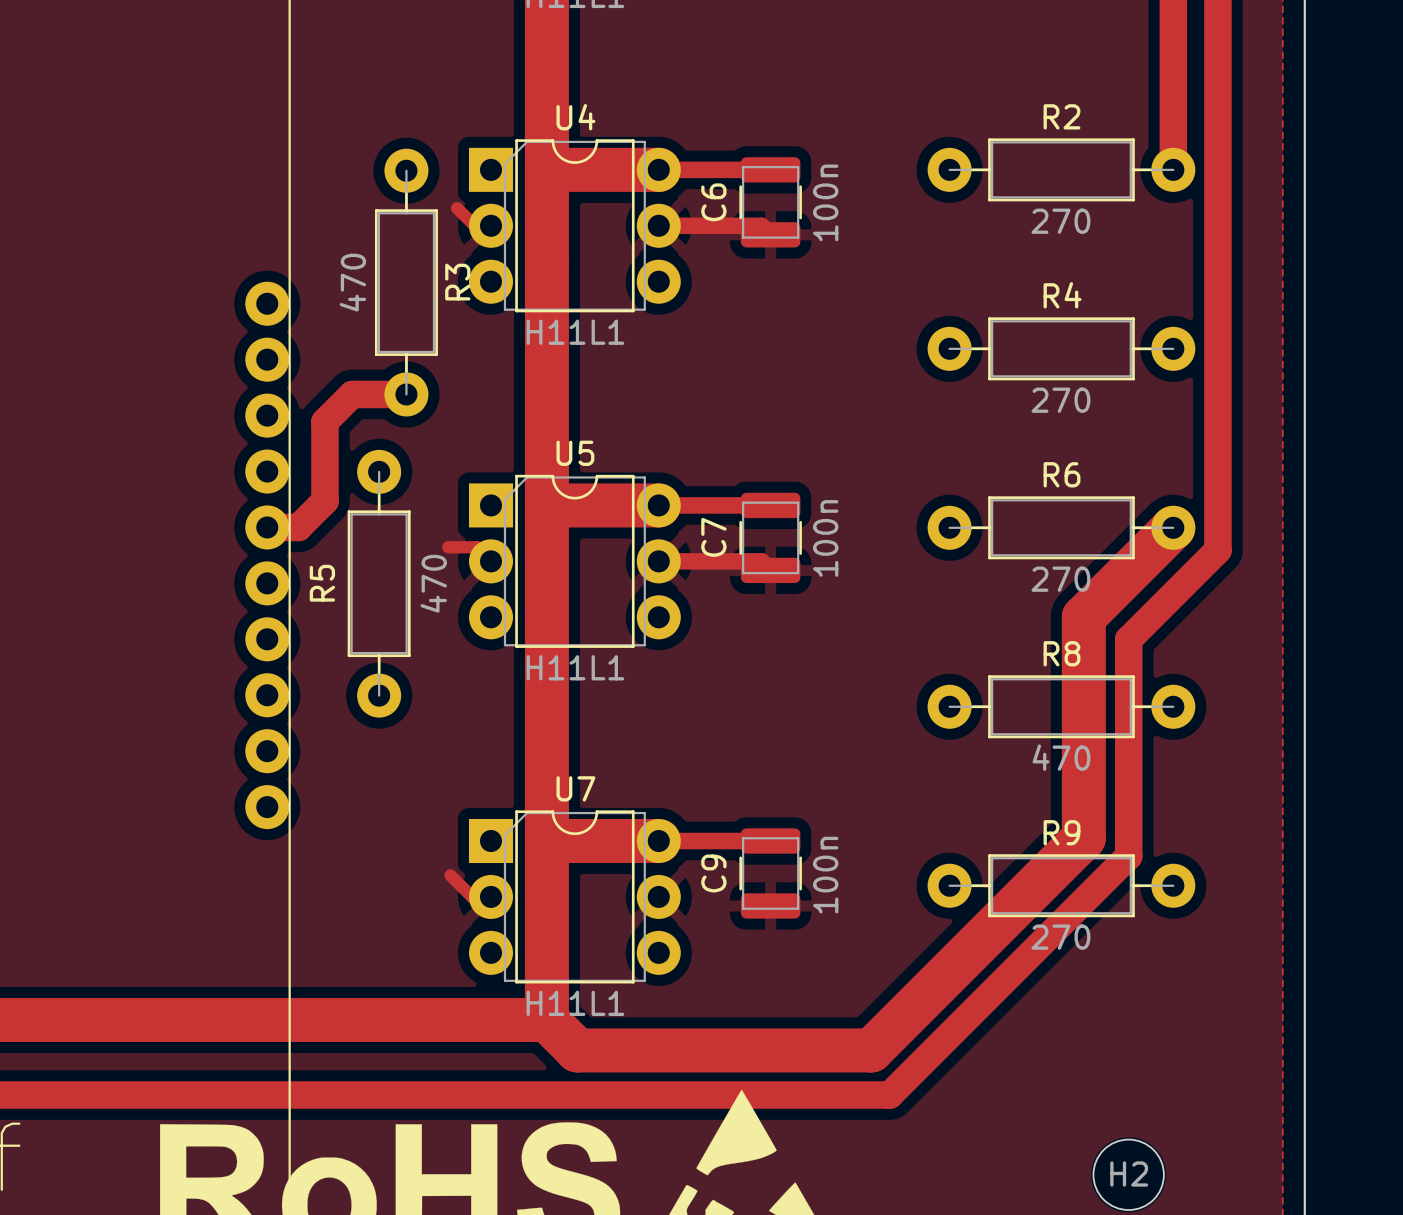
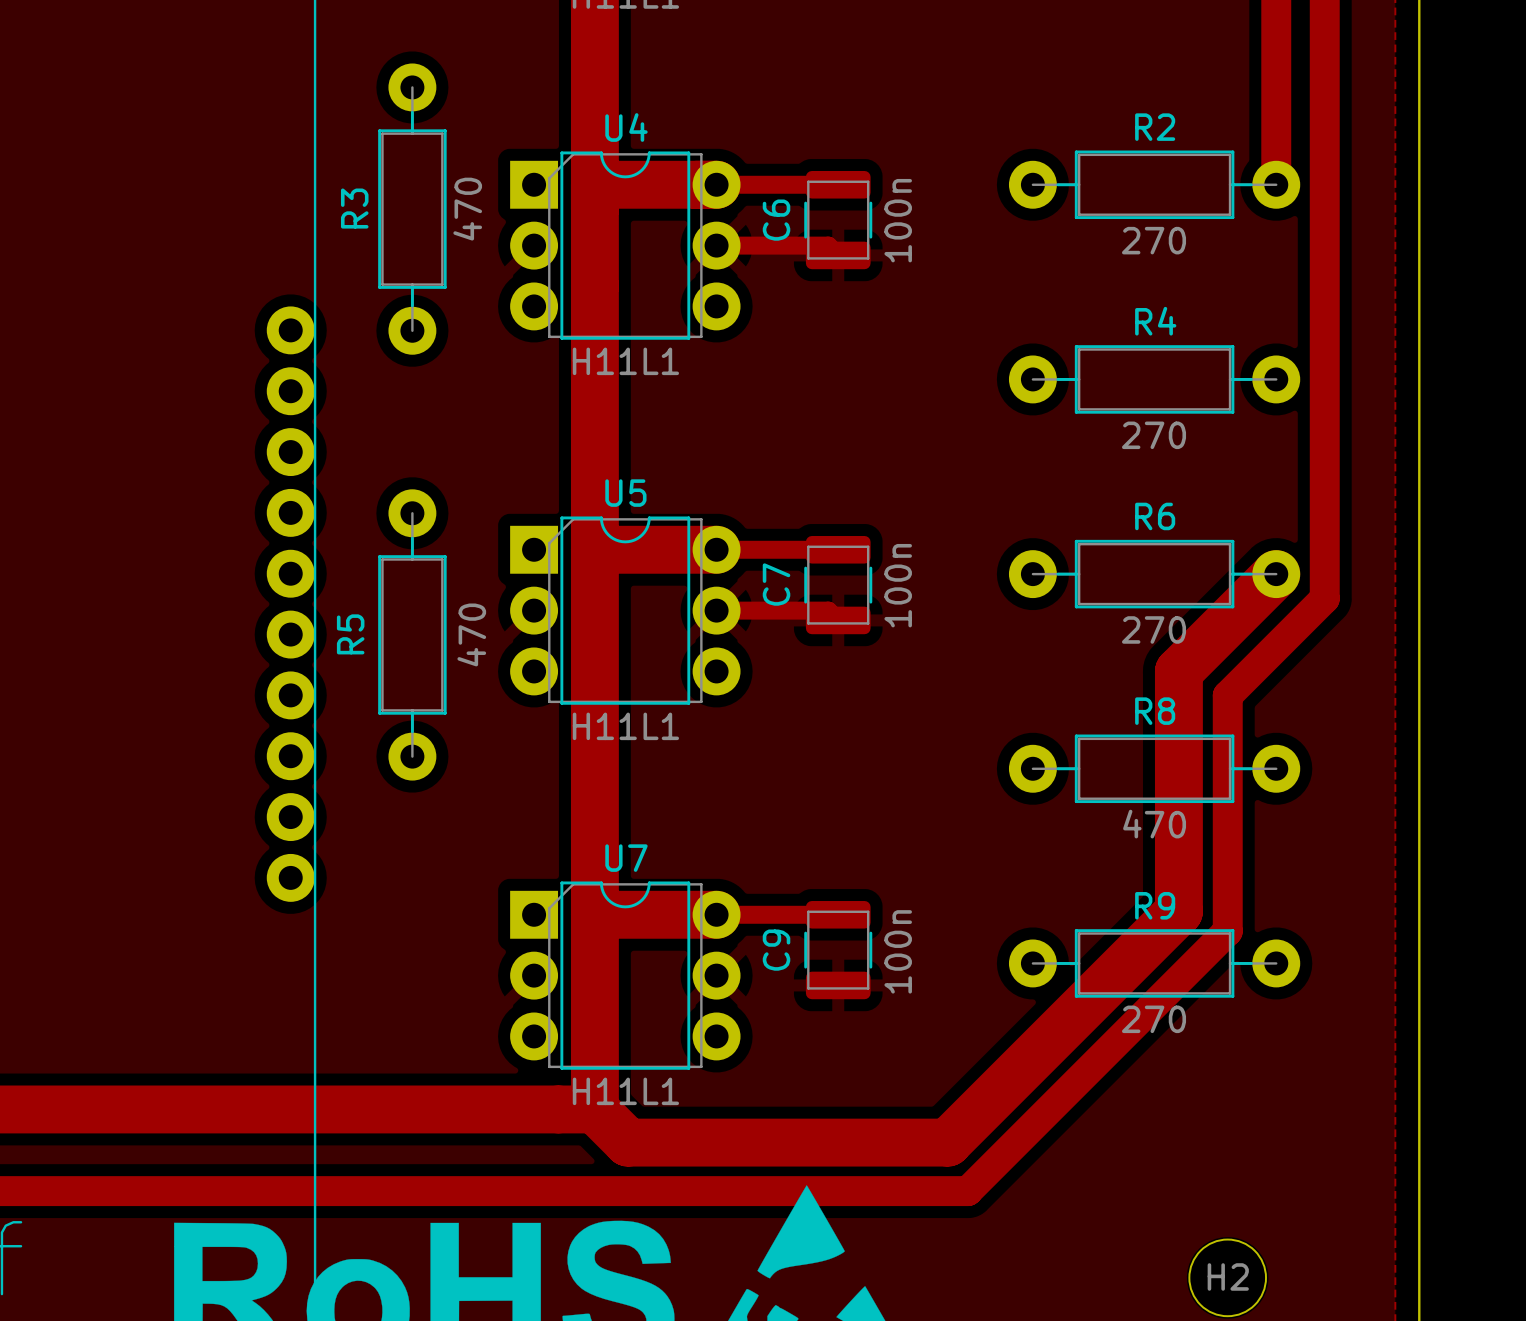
track: (457, 208) (474, 225) (491, 225) -> none
R3 value position: 470 (352, 282) -> 470 (467, 209)
R3 position: (406, 282) -> (412, 209)
R3 name position: R3 (457, 282) -> R3 (354, 208)
track: (406, 394) (352, 394) (324, 421) (324, 501) (298, 527) (267, 527) -> none
track: (448, 547) (476, 547) (491, 561) -> none
track: (450, 875) (472, 896) (491, 896) -> none

